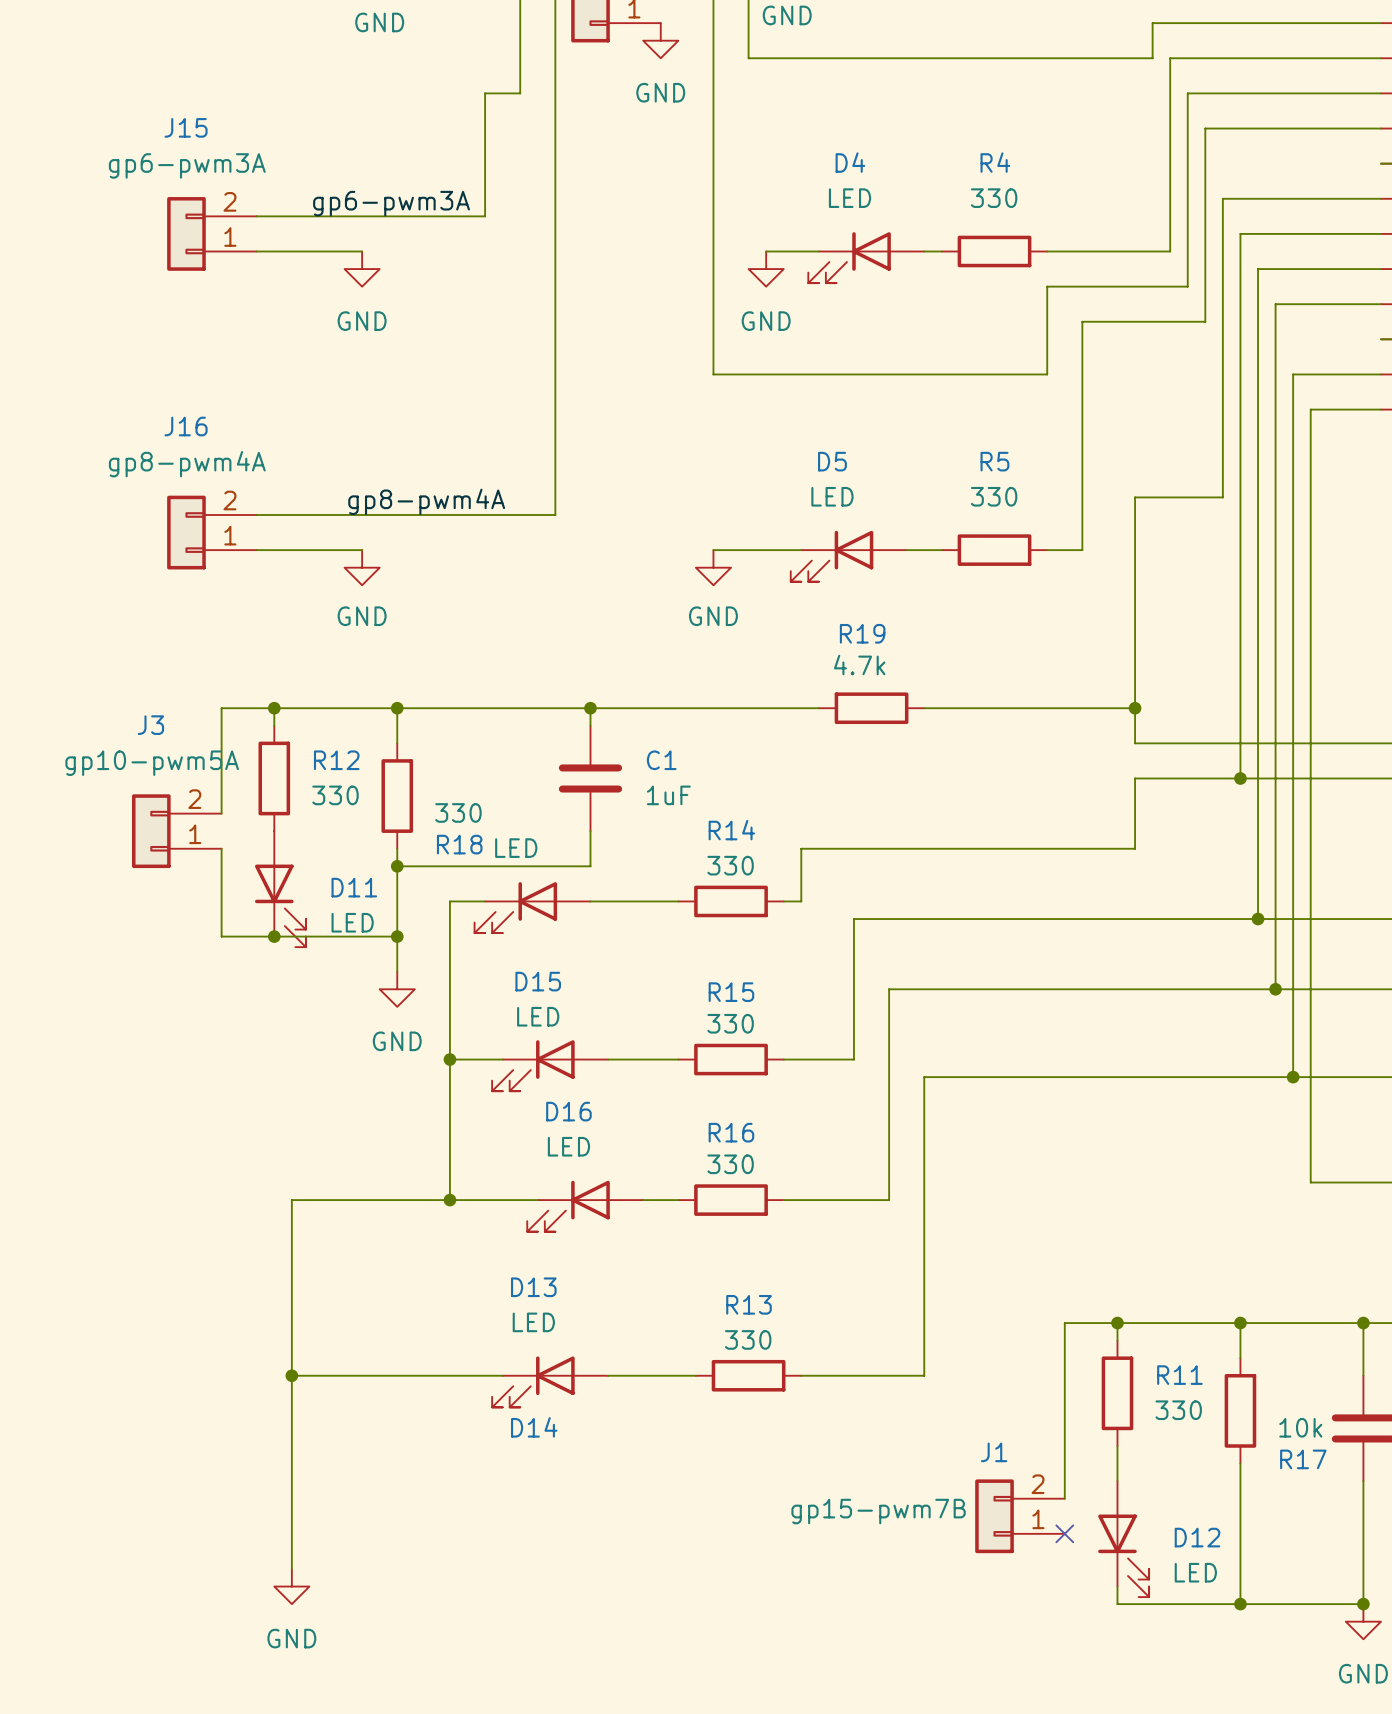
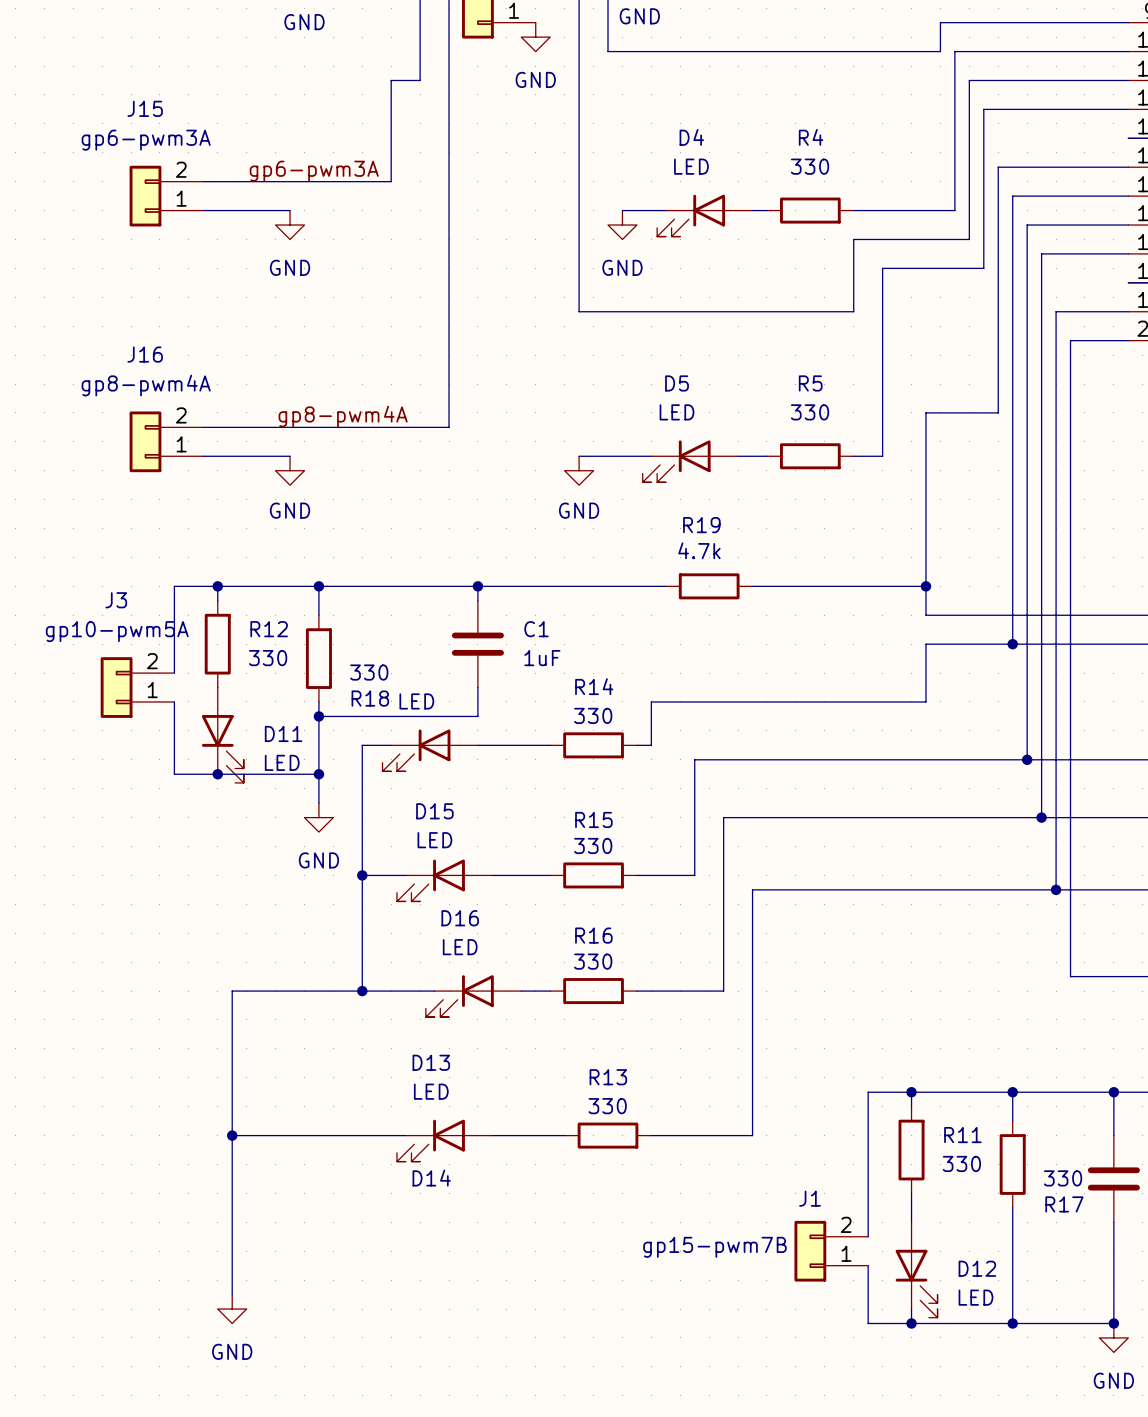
R17 value: 10k (1300, 1427) -> 330 (1063, 1178)
wire: none -> (868, 1265) (868, 1323) (911, 1323)
no-connect mark: (1064, 1533) -> none
junction: none -> (911, 1323)

